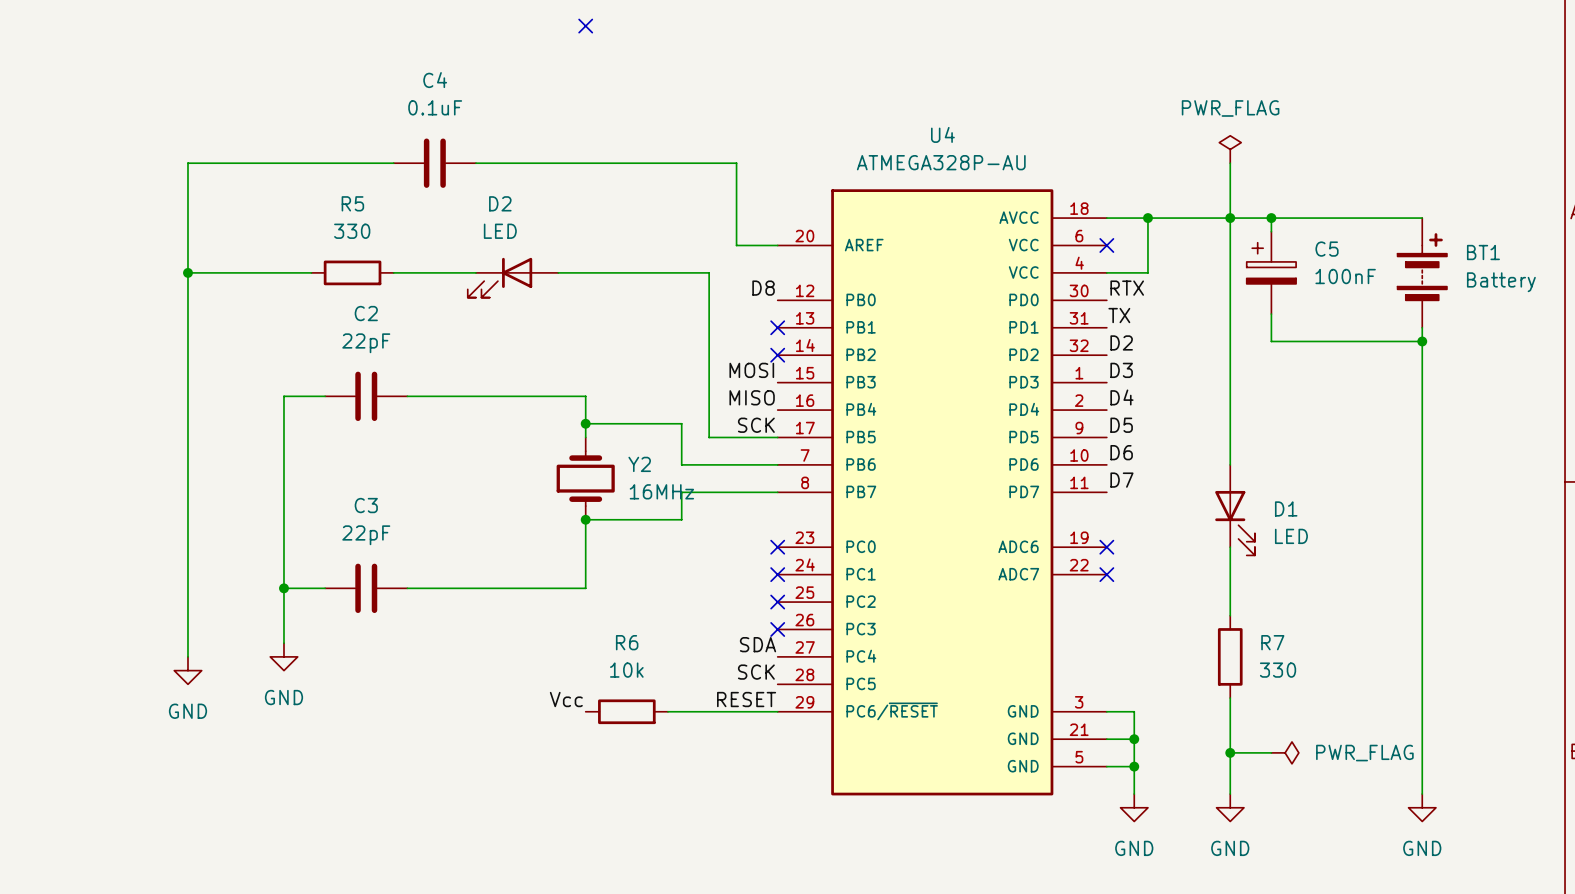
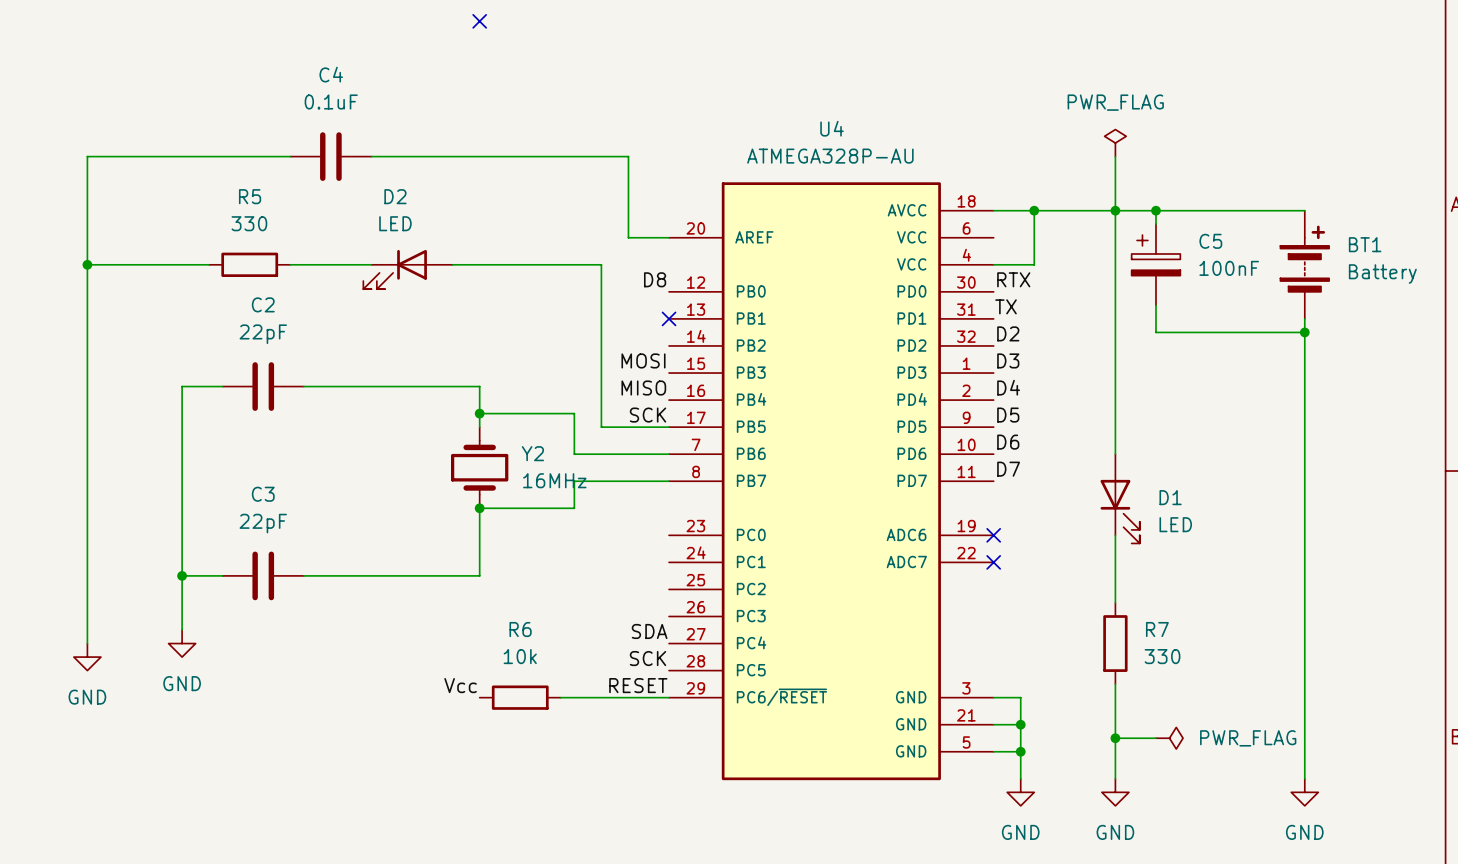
no-connect mark: (1106, 245) -> none
no-connect mark: (777, 355) -> none
no-connect mark: (777, 547) -> none
no-connect mark: (777, 574) -> none
no-connect mark: (777, 602) -> none
no-connect mark: (777, 629) -> none

